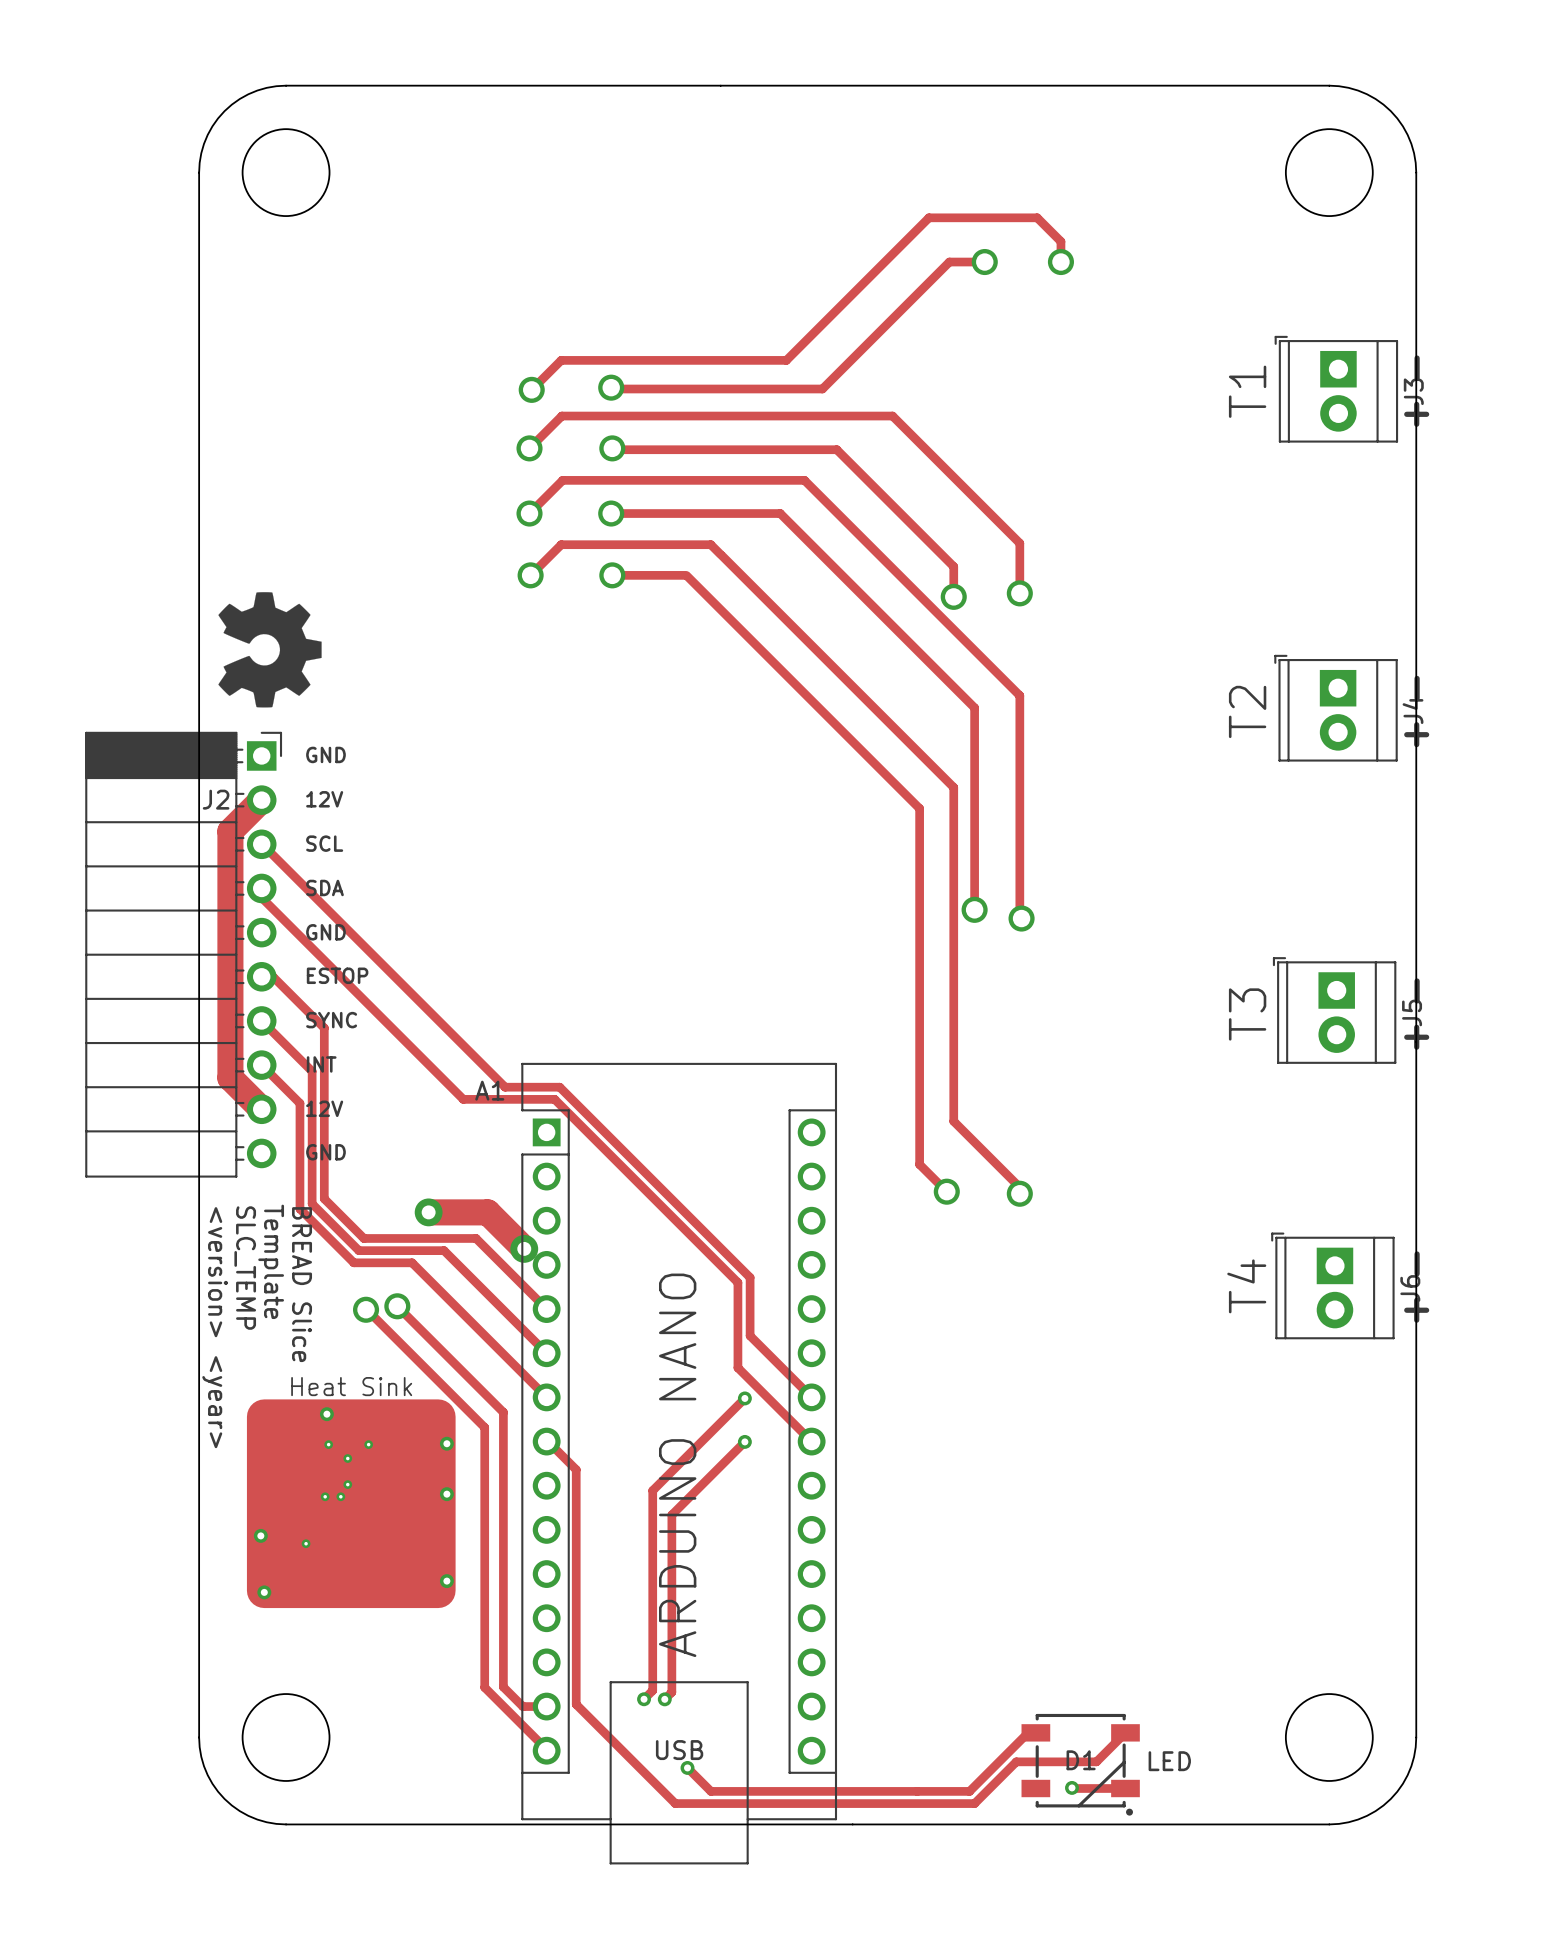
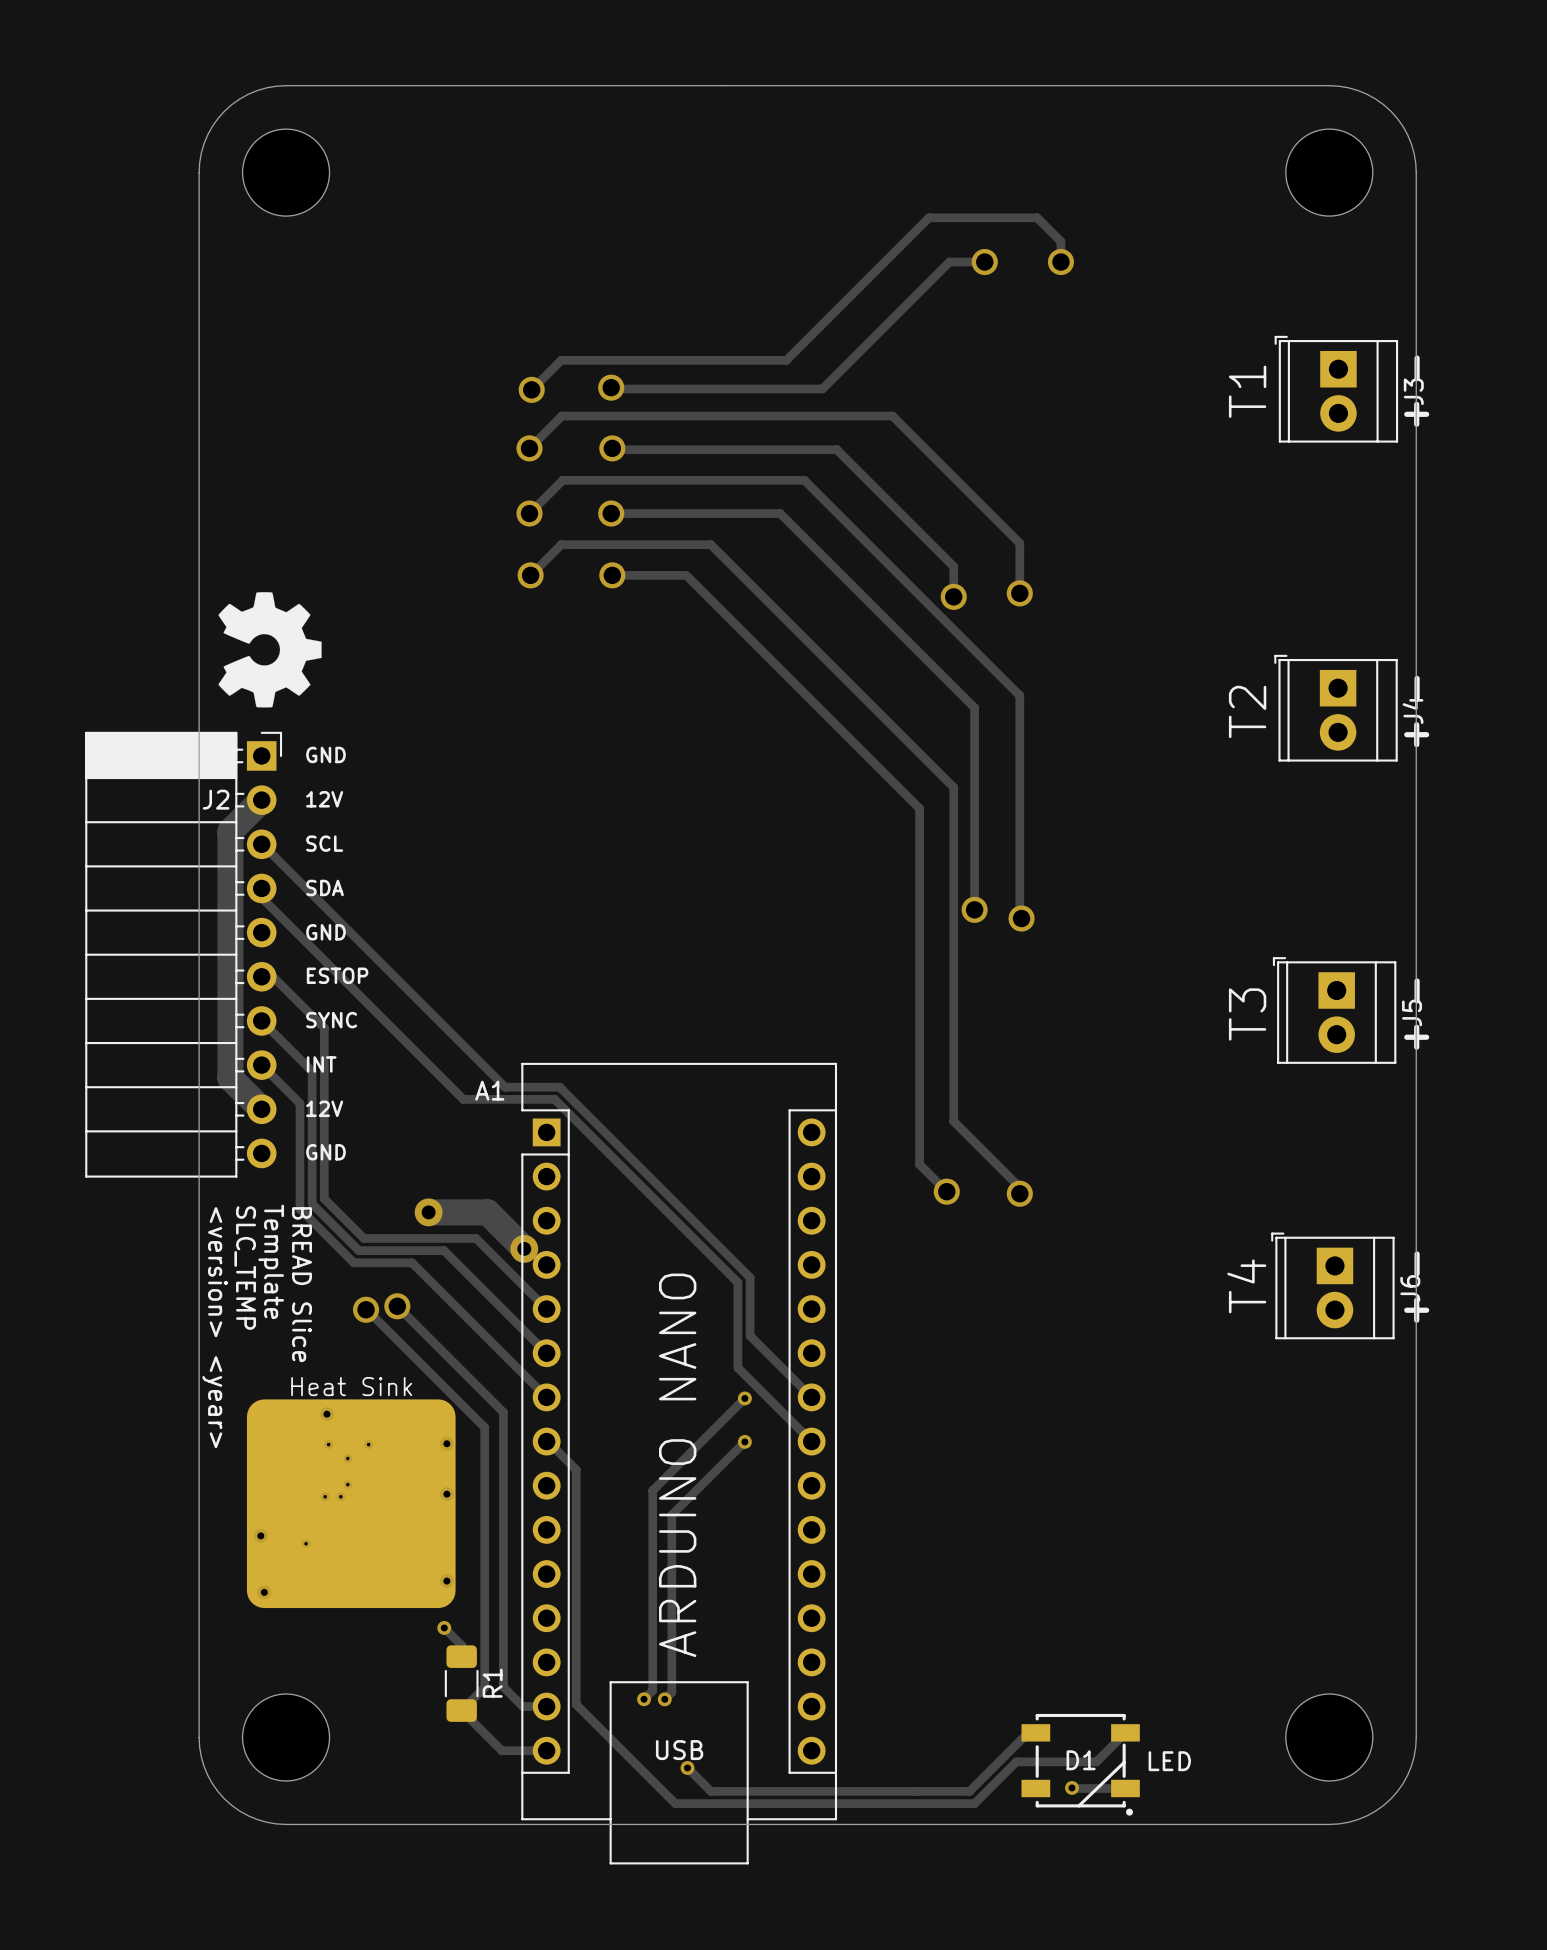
track: none -> (444, 1627) (461, 1645) (461, 1656)
via: none -> (444, 1627)
R1: none -> (461, 1683)
track: (484, 1687) (546, 1750) -> (484, 1687) (461, 1710) (501, 1750) (546, 1750)

